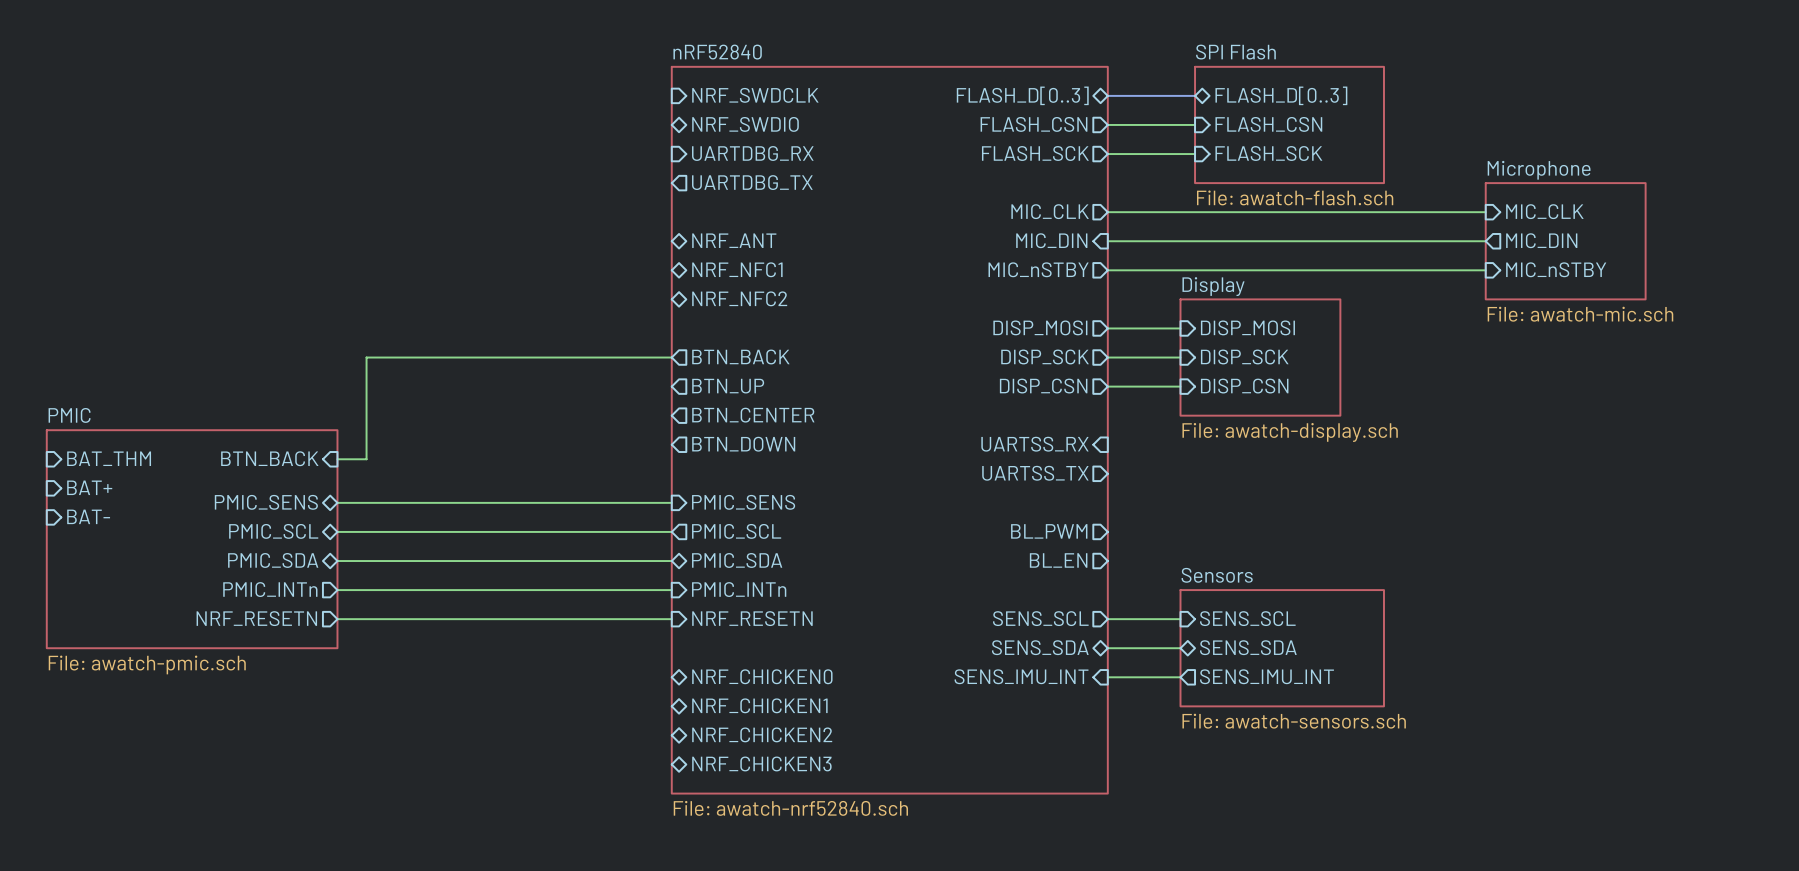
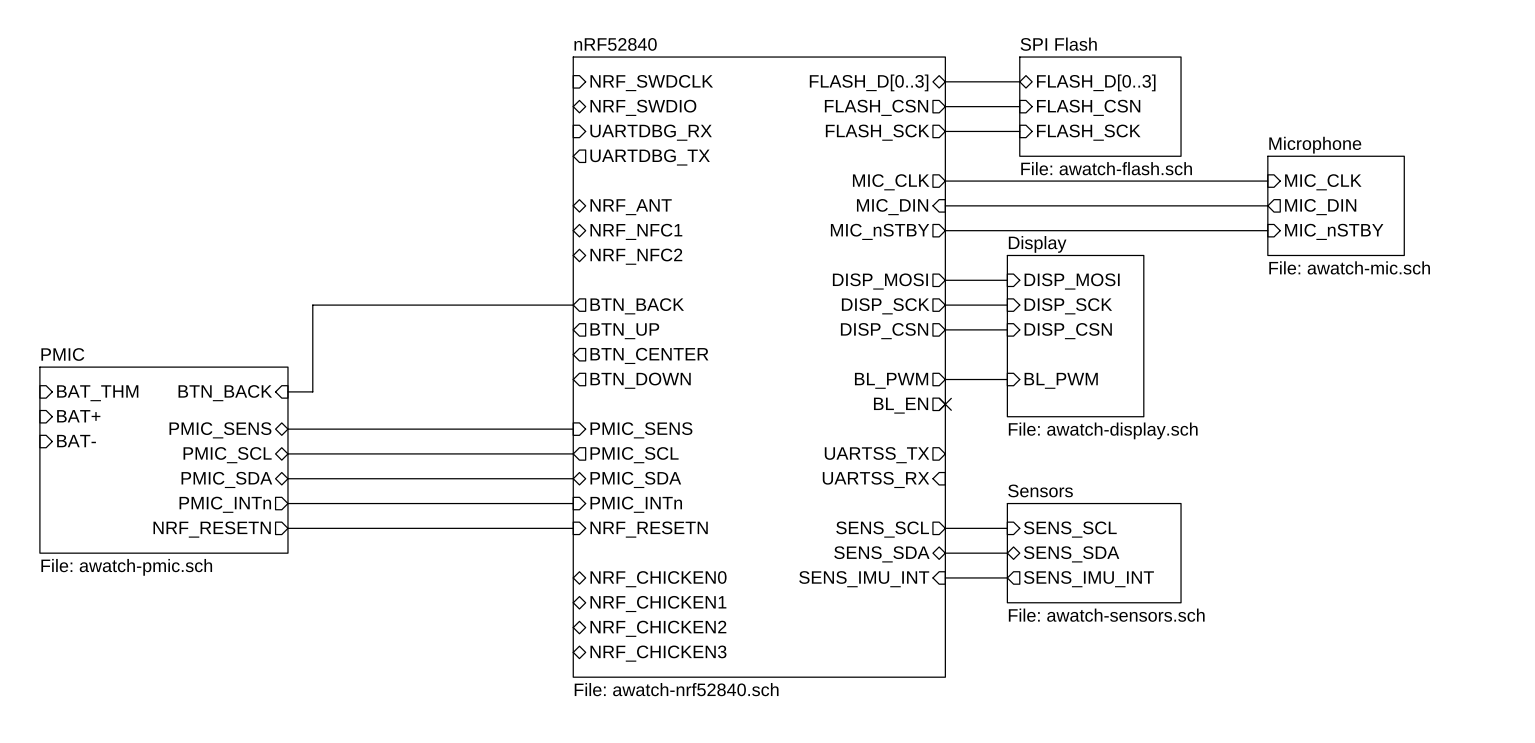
sheet Display: File: awatch-display.sch (1260, 357) -> none
sheet Display: none -> File: awatch-display.sch (1075, 336)
sheet pin shape: input (1034, 444) -> output (891, 380)
sheet pin: UARTSS_RX (1034, 444) -> BL_PWM (891, 380)
wire: none -> (945, 379) (1007, 379)
sheet pin: none -> BL_PWM (1061, 380)
sheet pin: UARTSS_TX (1035, 473) -> BL_EN (901, 405)
no-connect mark: none -> (945, 404)
sheet pin: BL_PWM (1049, 531) -> UARTSS_TX (877, 455)
sheet pin shape: output (1058, 560) -> input (876, 479)
sheet pin: BL_EN (1058, 560) -> UARTSS_RX (876, 479)

